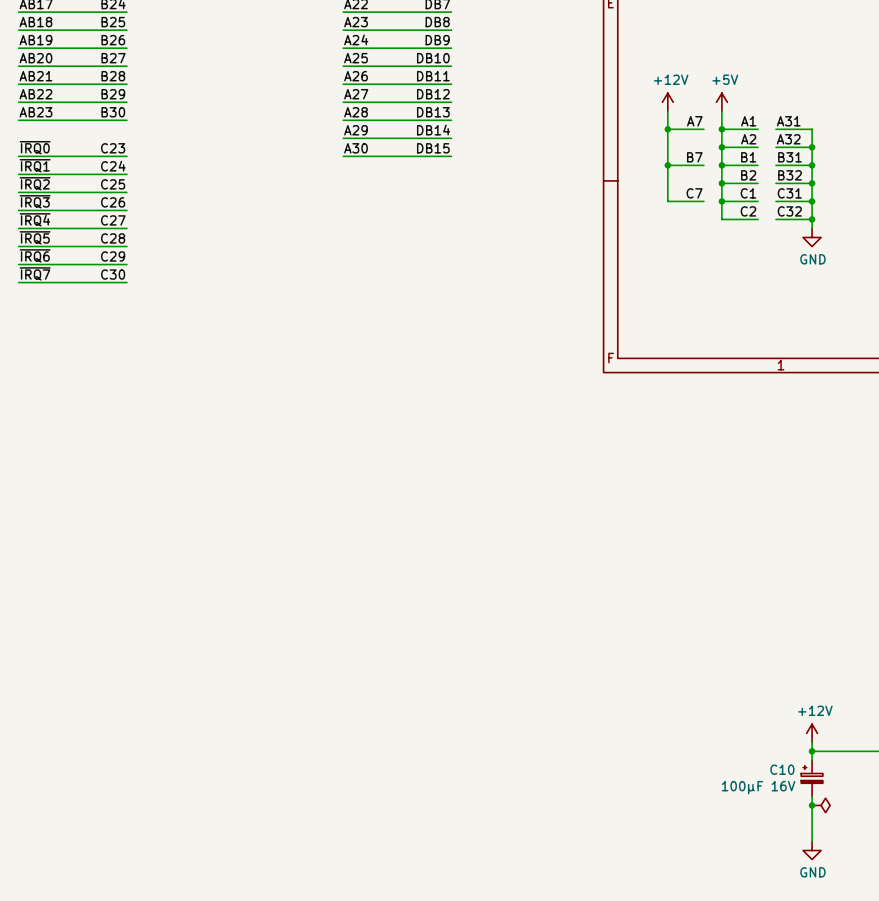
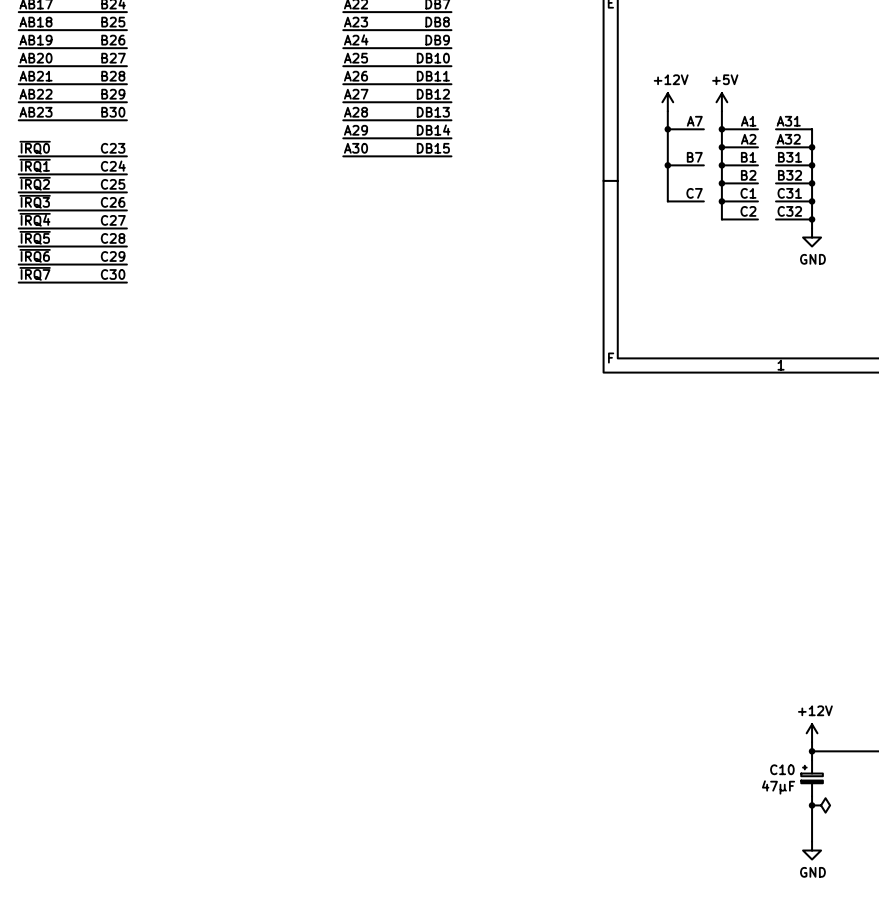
C10 value: 100µF 16V (758, 787) -> 47µF (778, 787)

